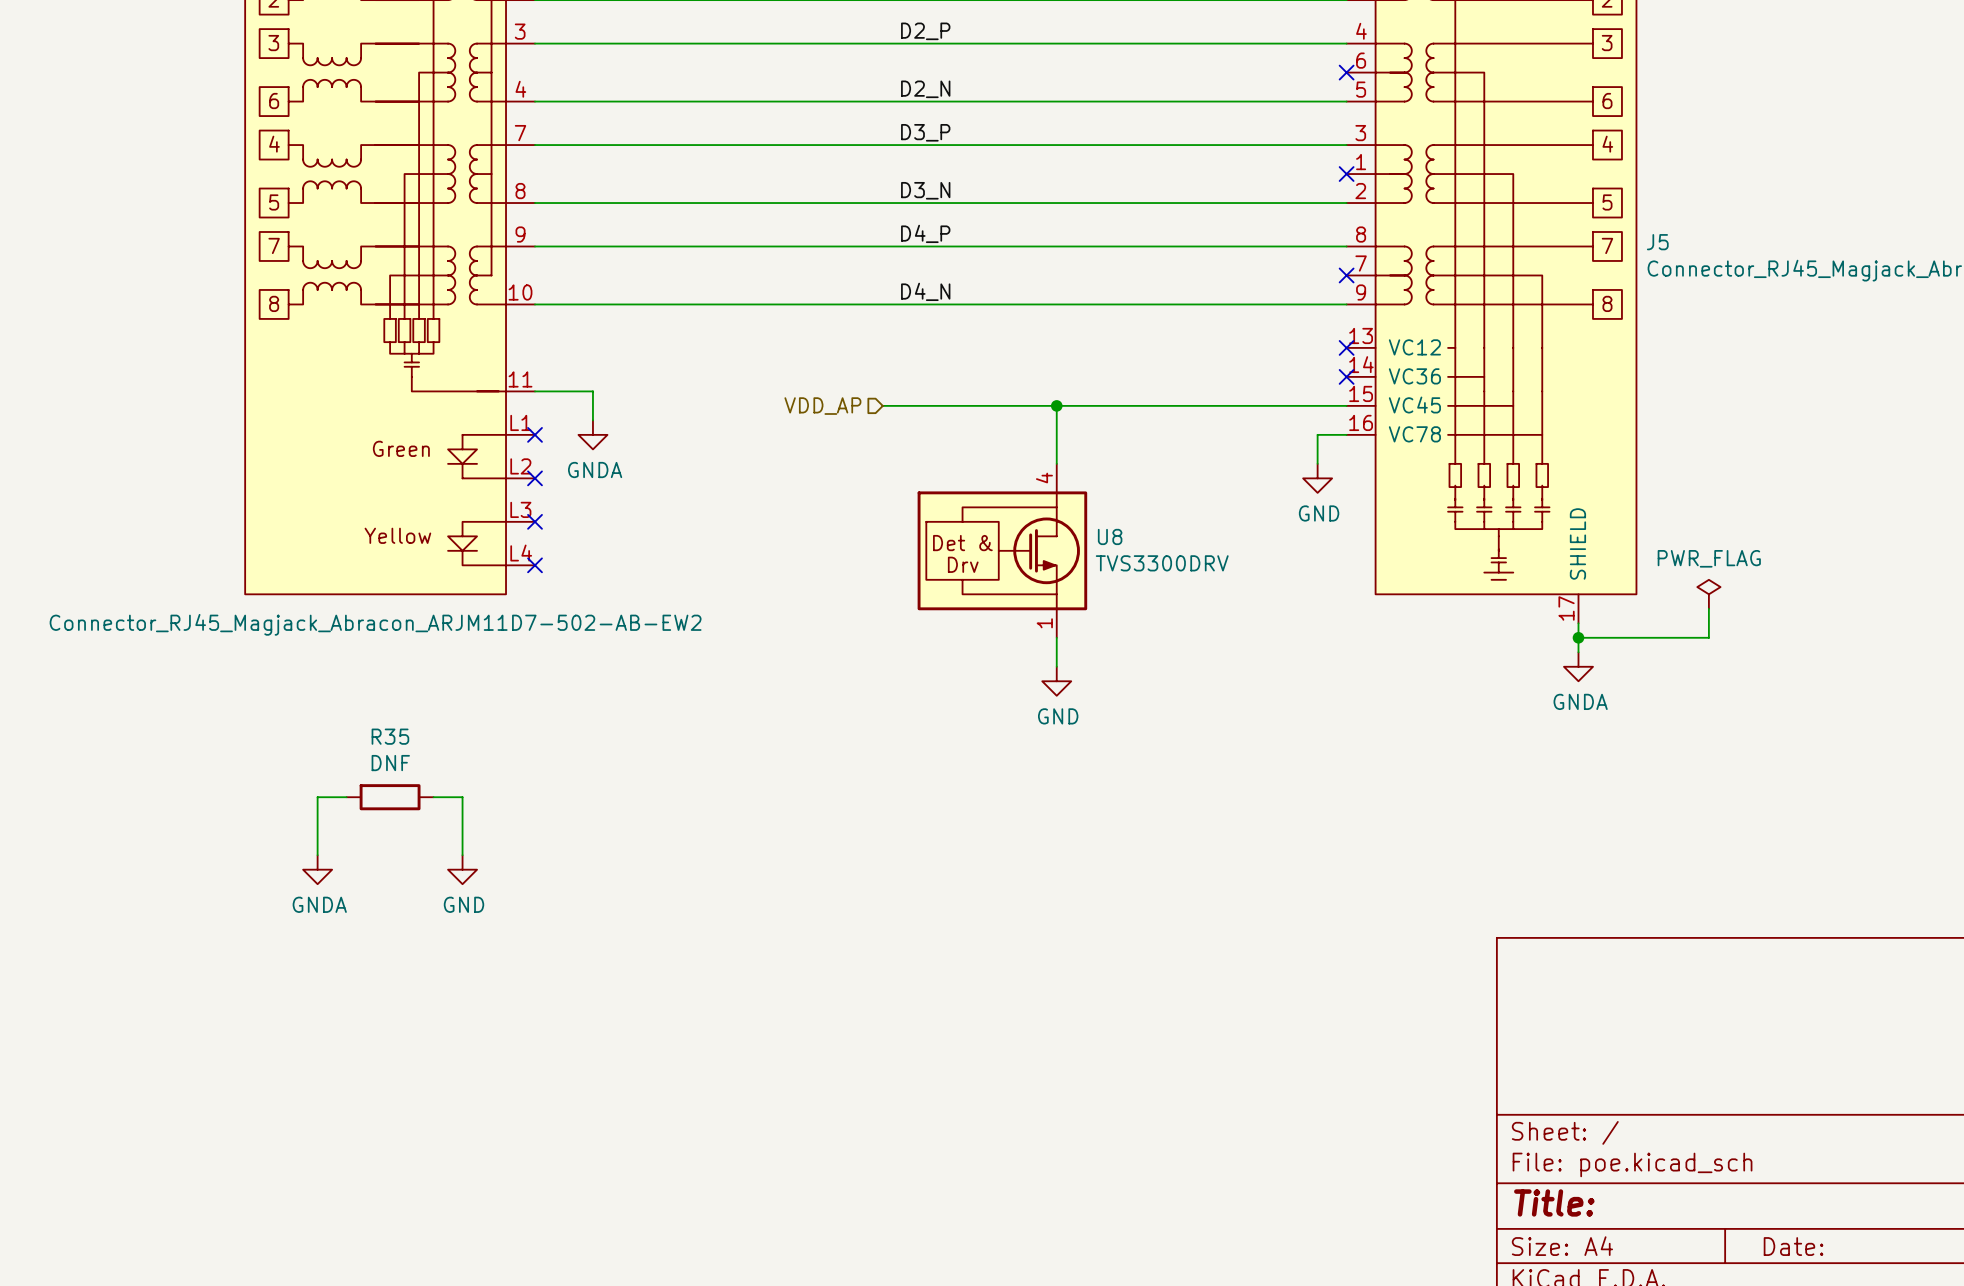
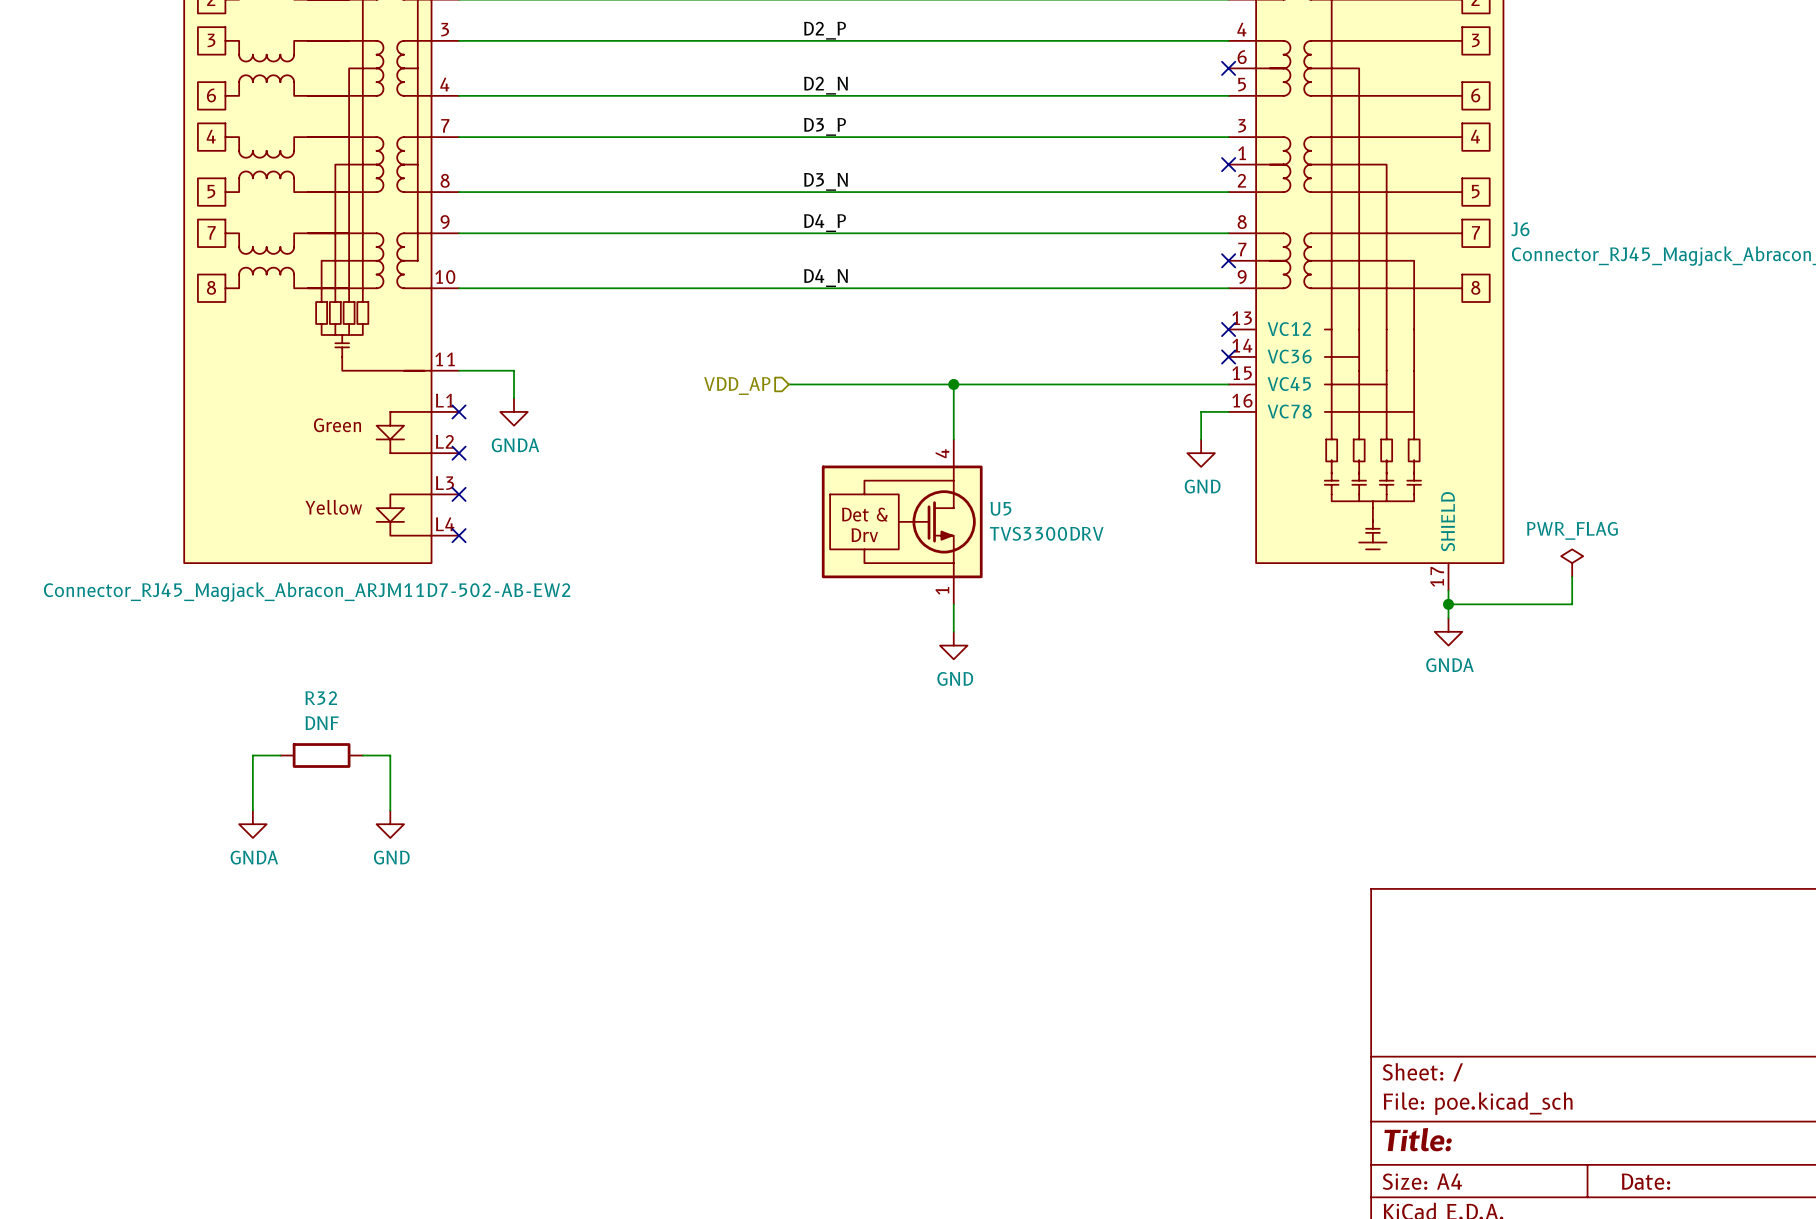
J5 name: J5 (1657, 242) -> J6 (1520, 229)
U8 name: U8 (1110, 536) -> U5 (1000, 508)
R35 name: R35 (390, 736) -> R32 (321, 698)

